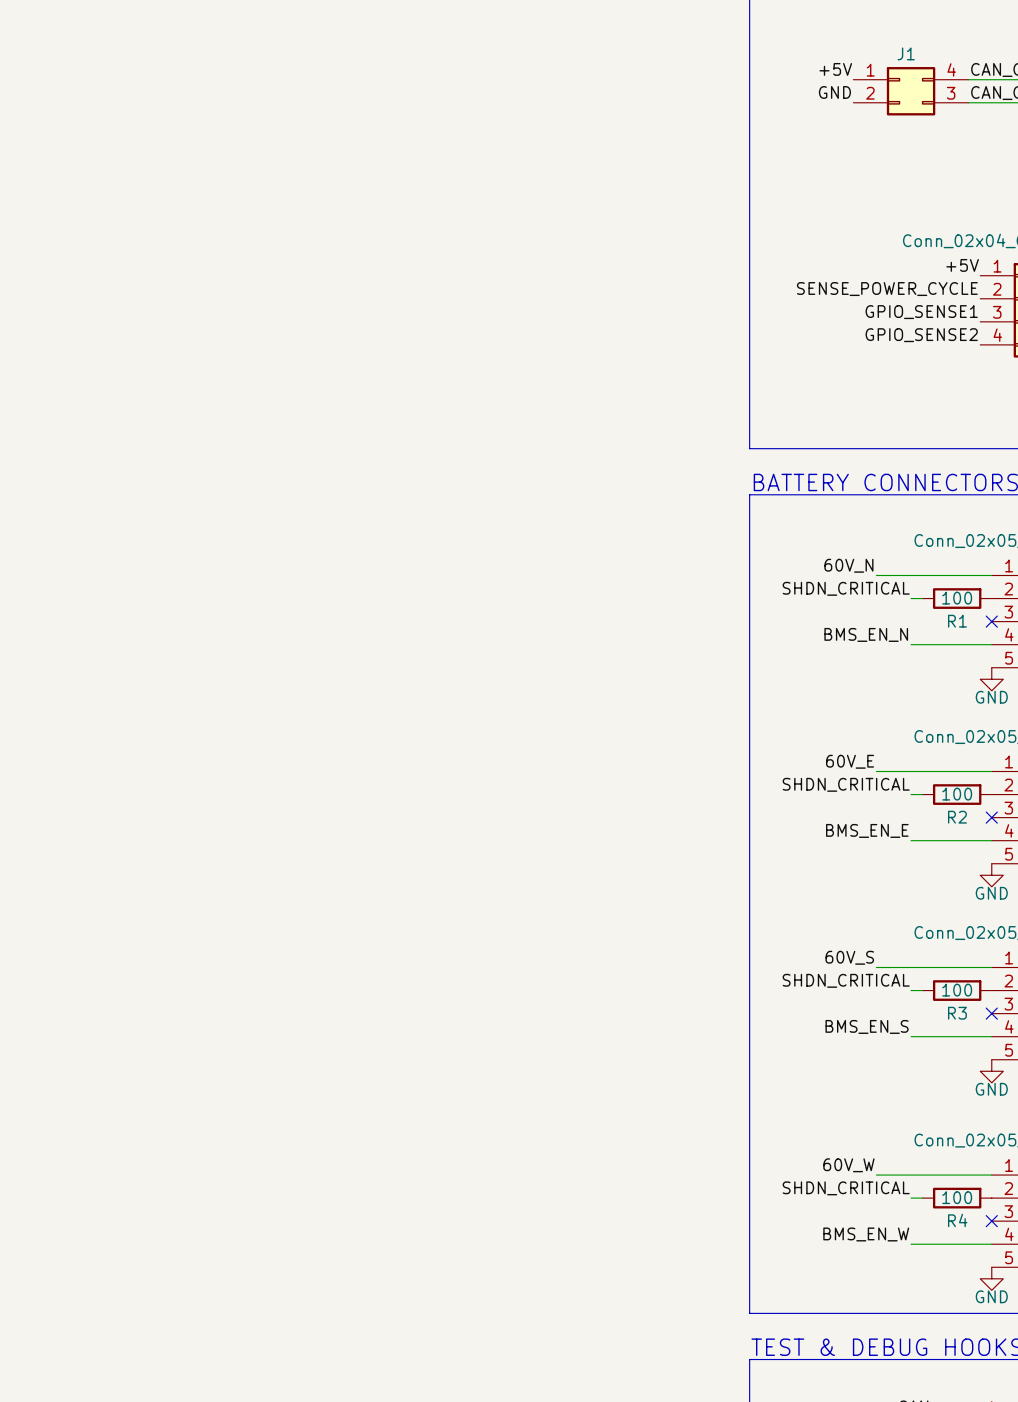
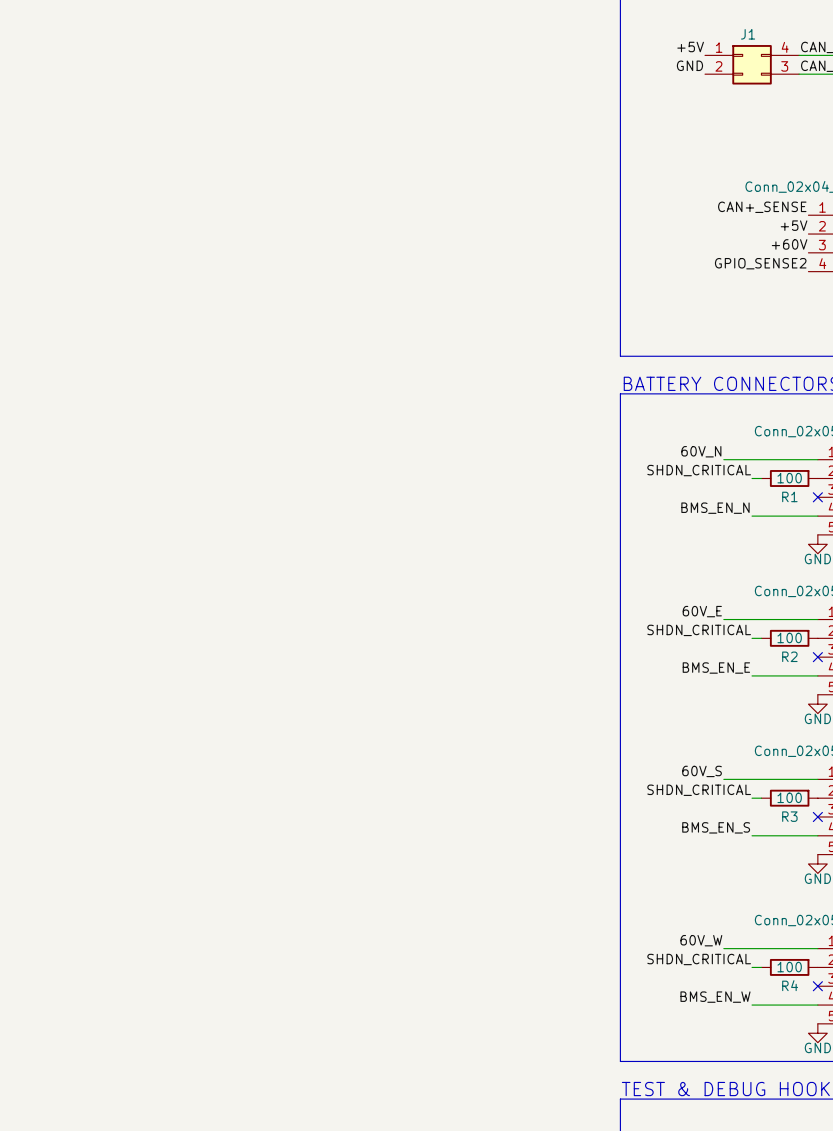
label: +5V (962, 265) -> CAN+_SENSE (762, 207)
label: SENSE_POWER_CYCLE (887, 289) -> +5V (794, 225)
label: GPIO_SENSE1 (921, 312) -> +60V (789, 244)

